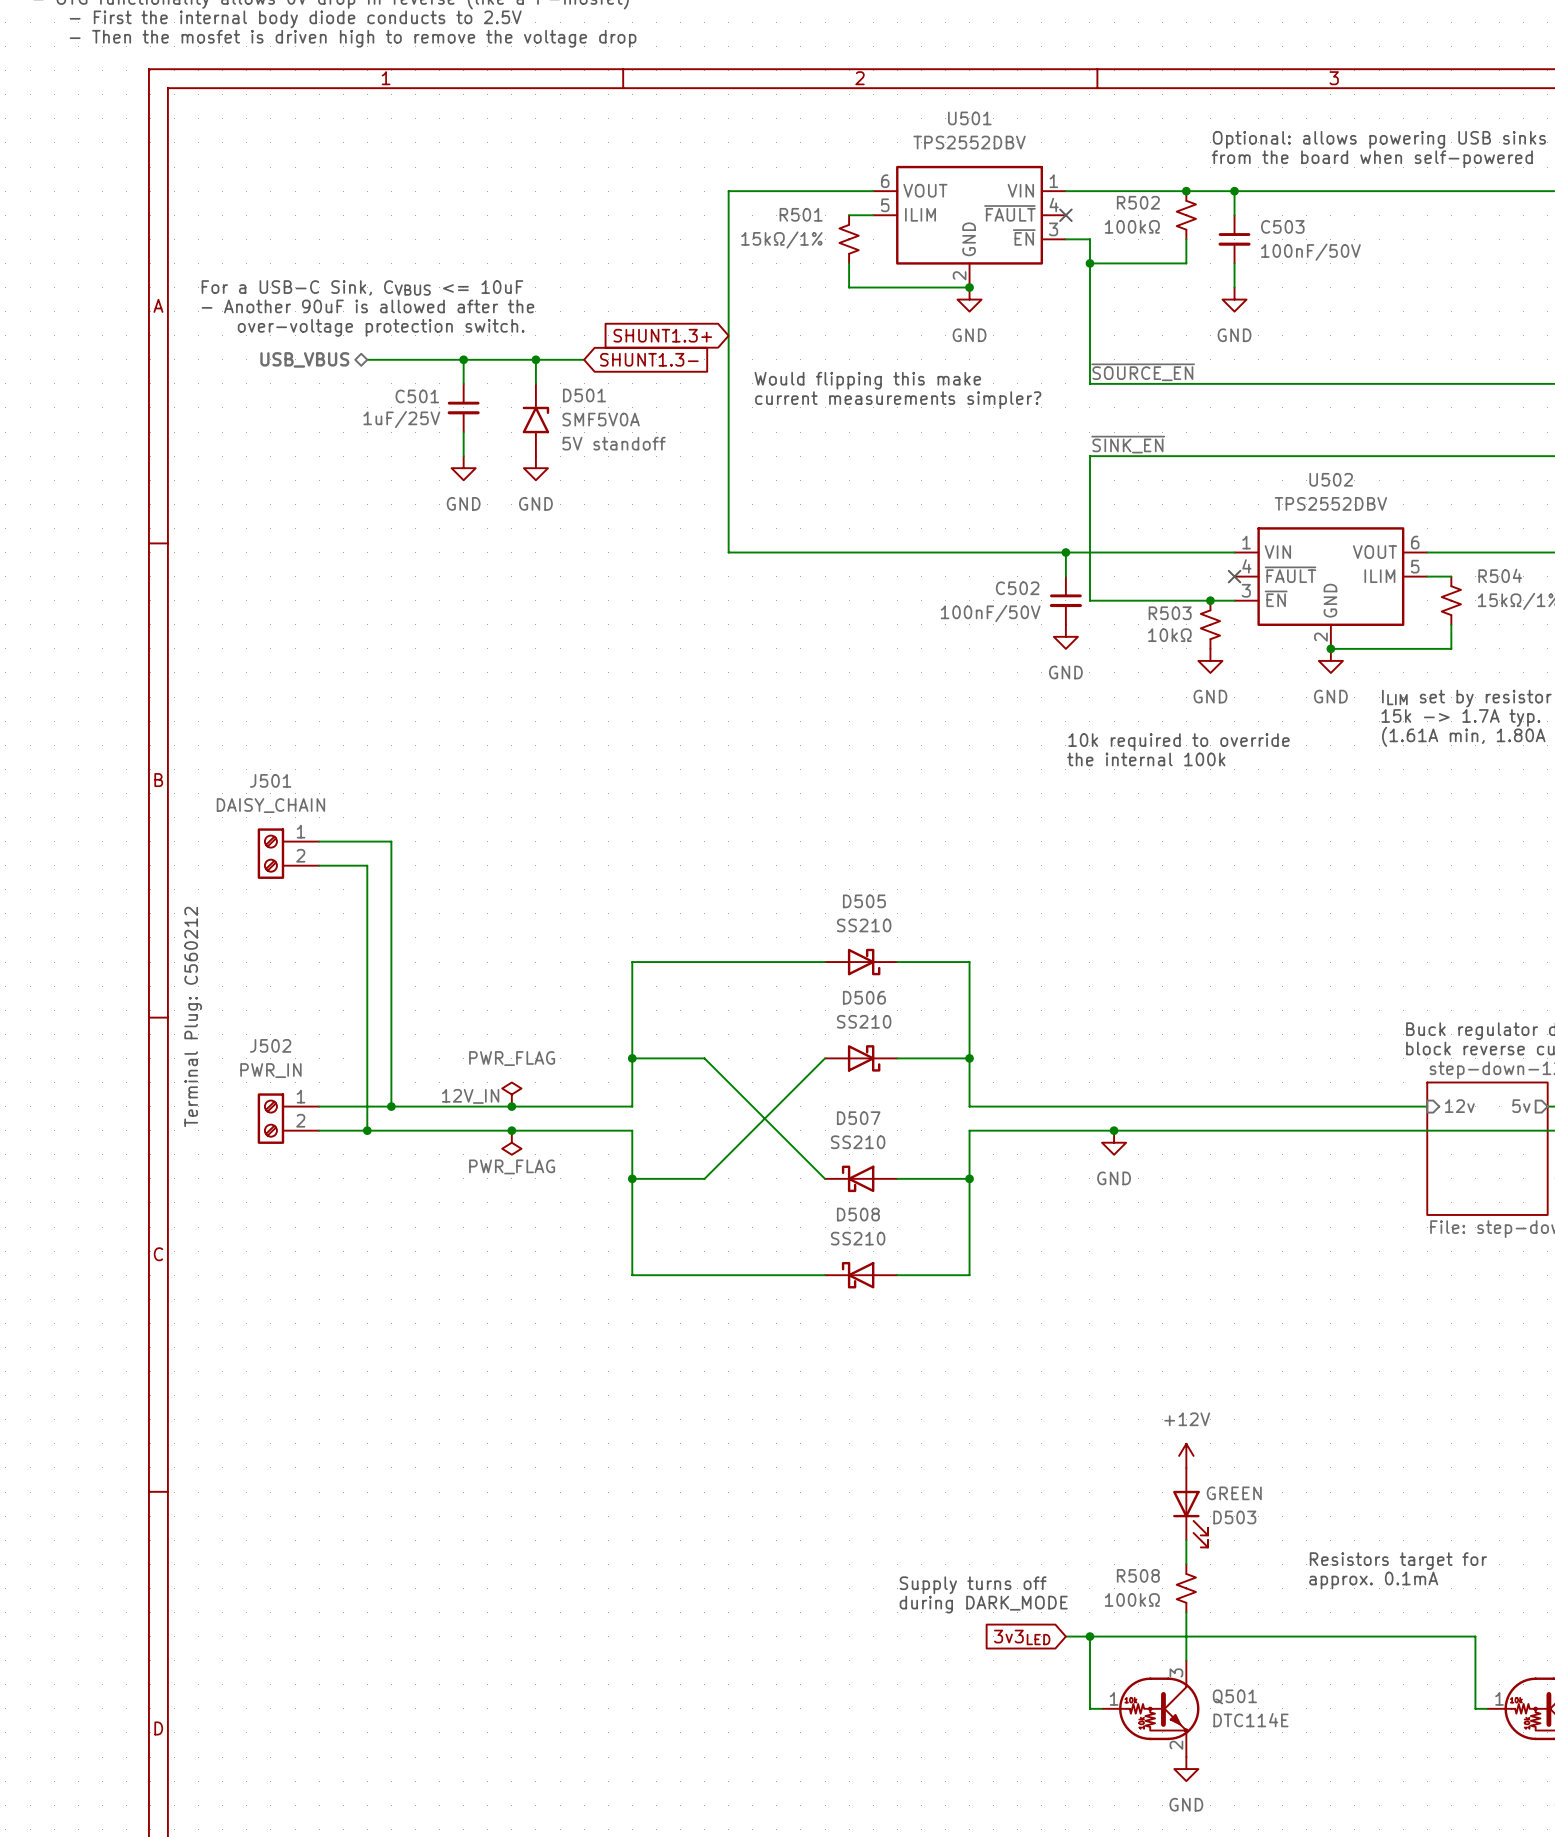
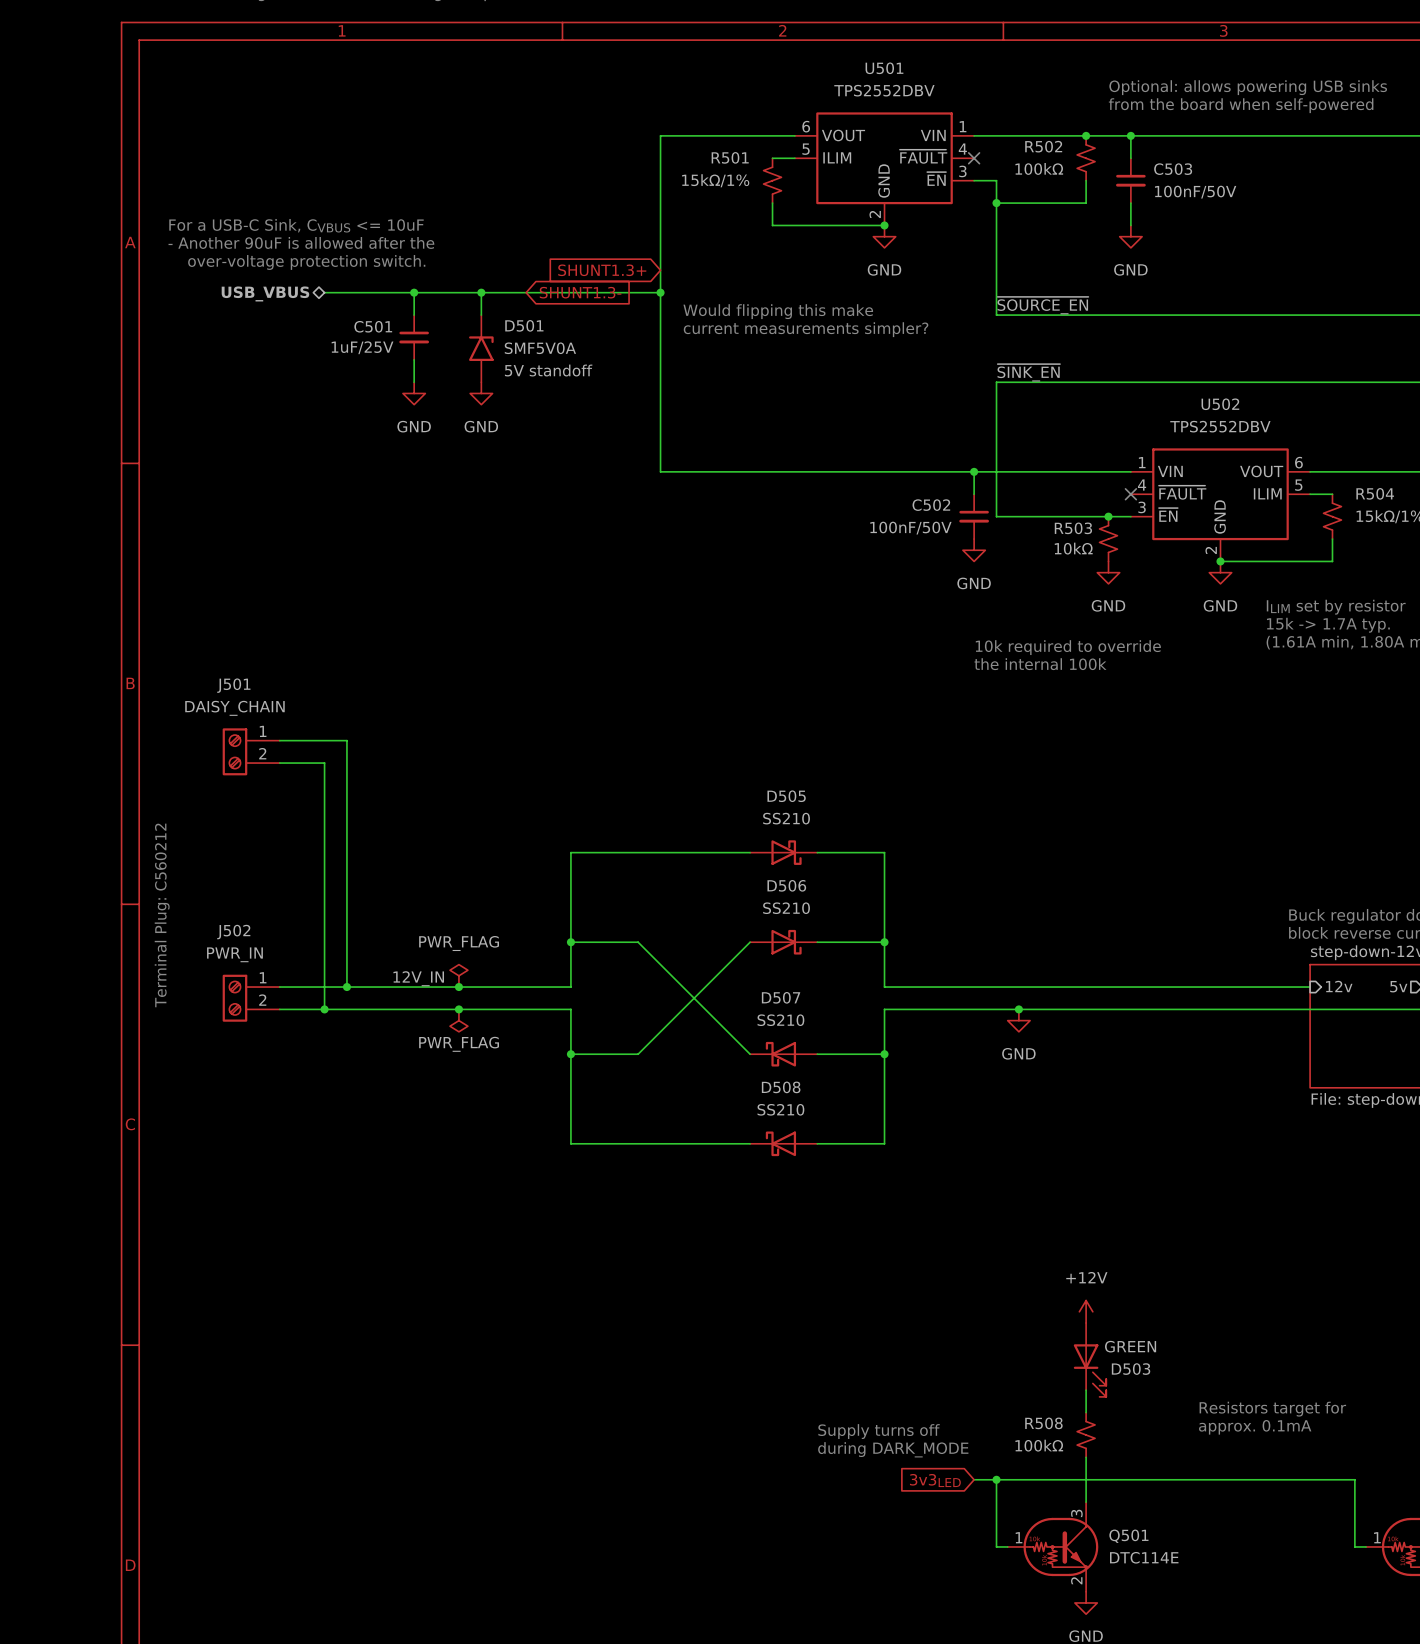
wire: none -> (526, 292) (660, 292)
junction: none -> (660, 292)

